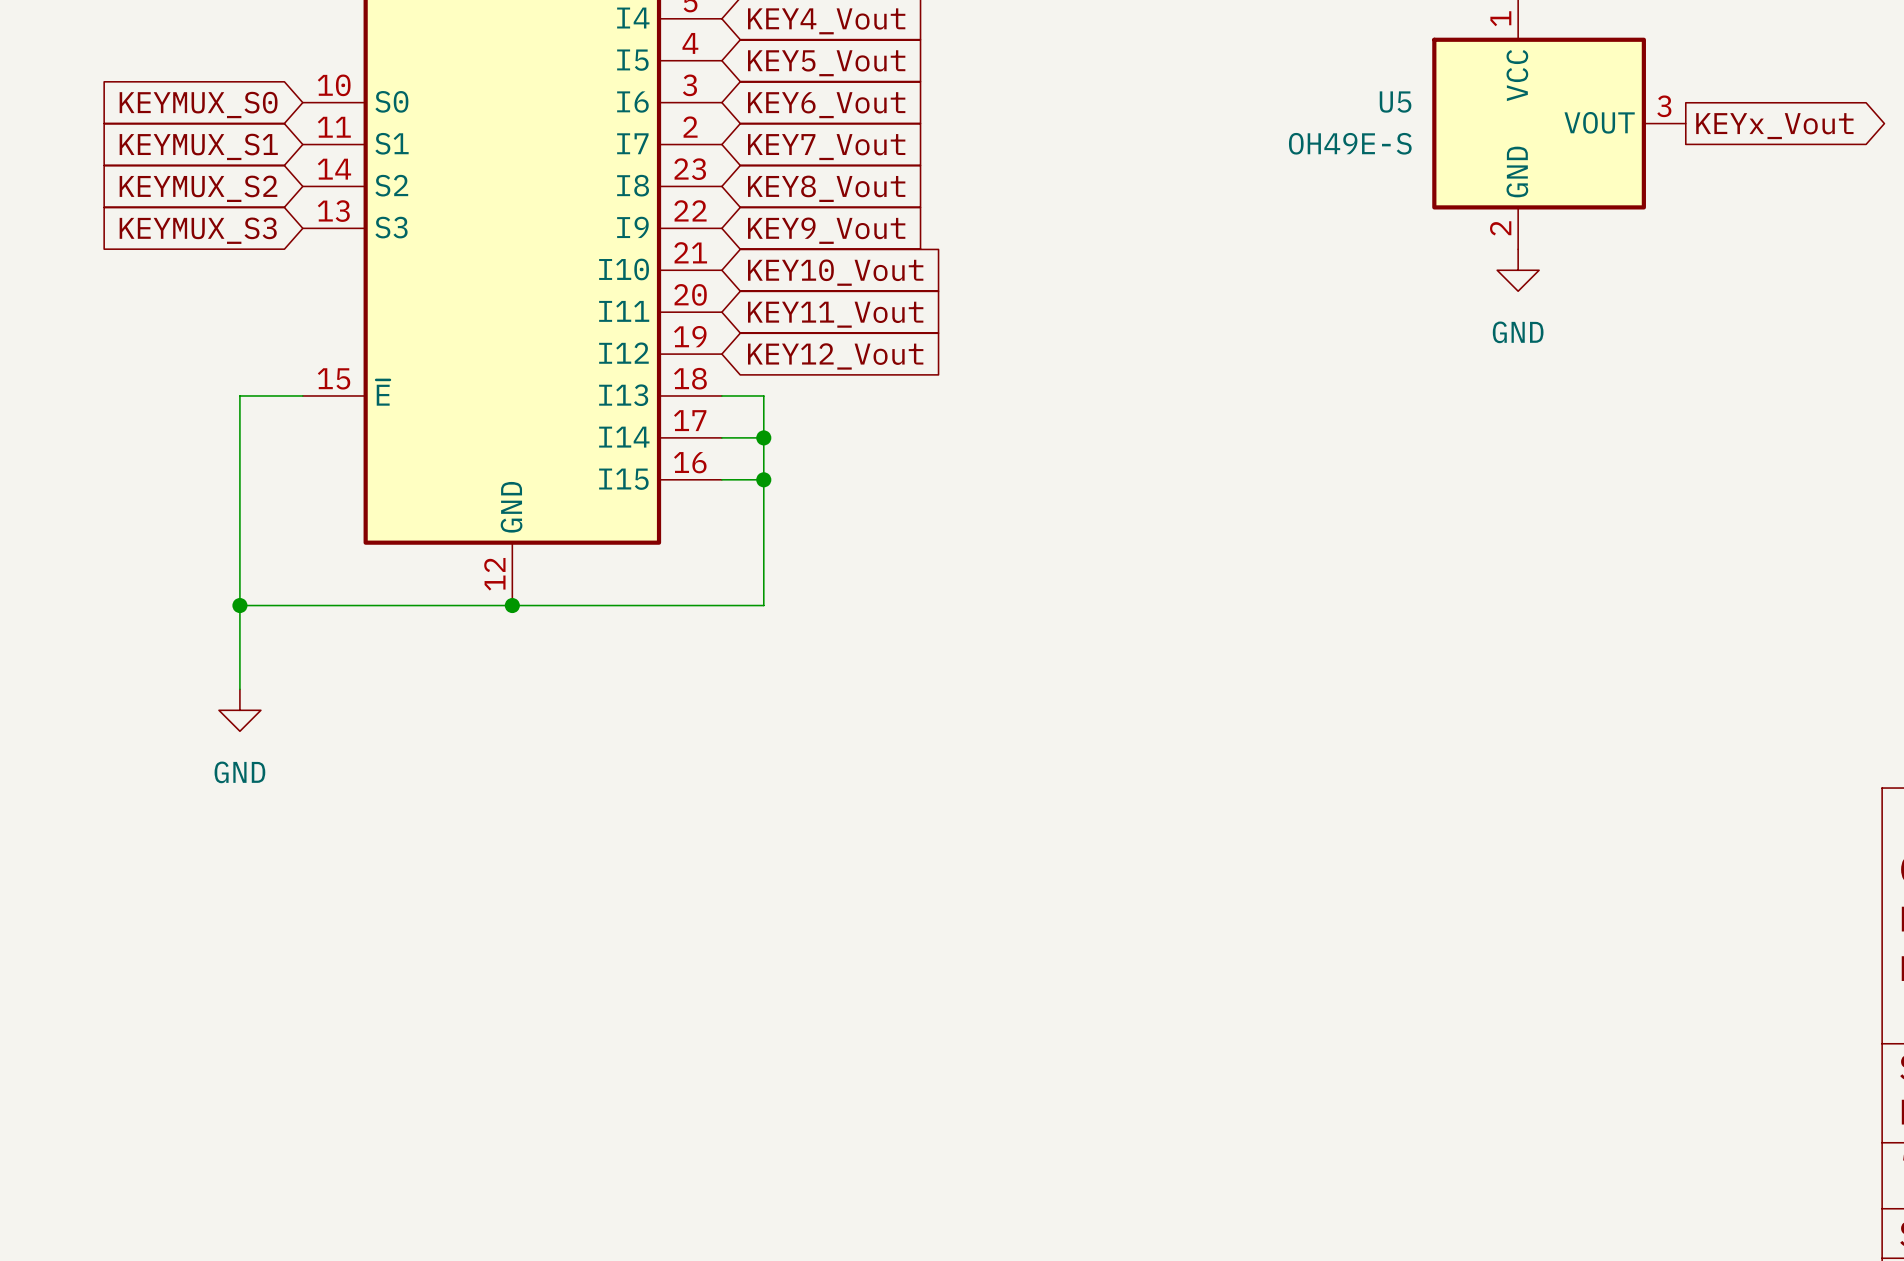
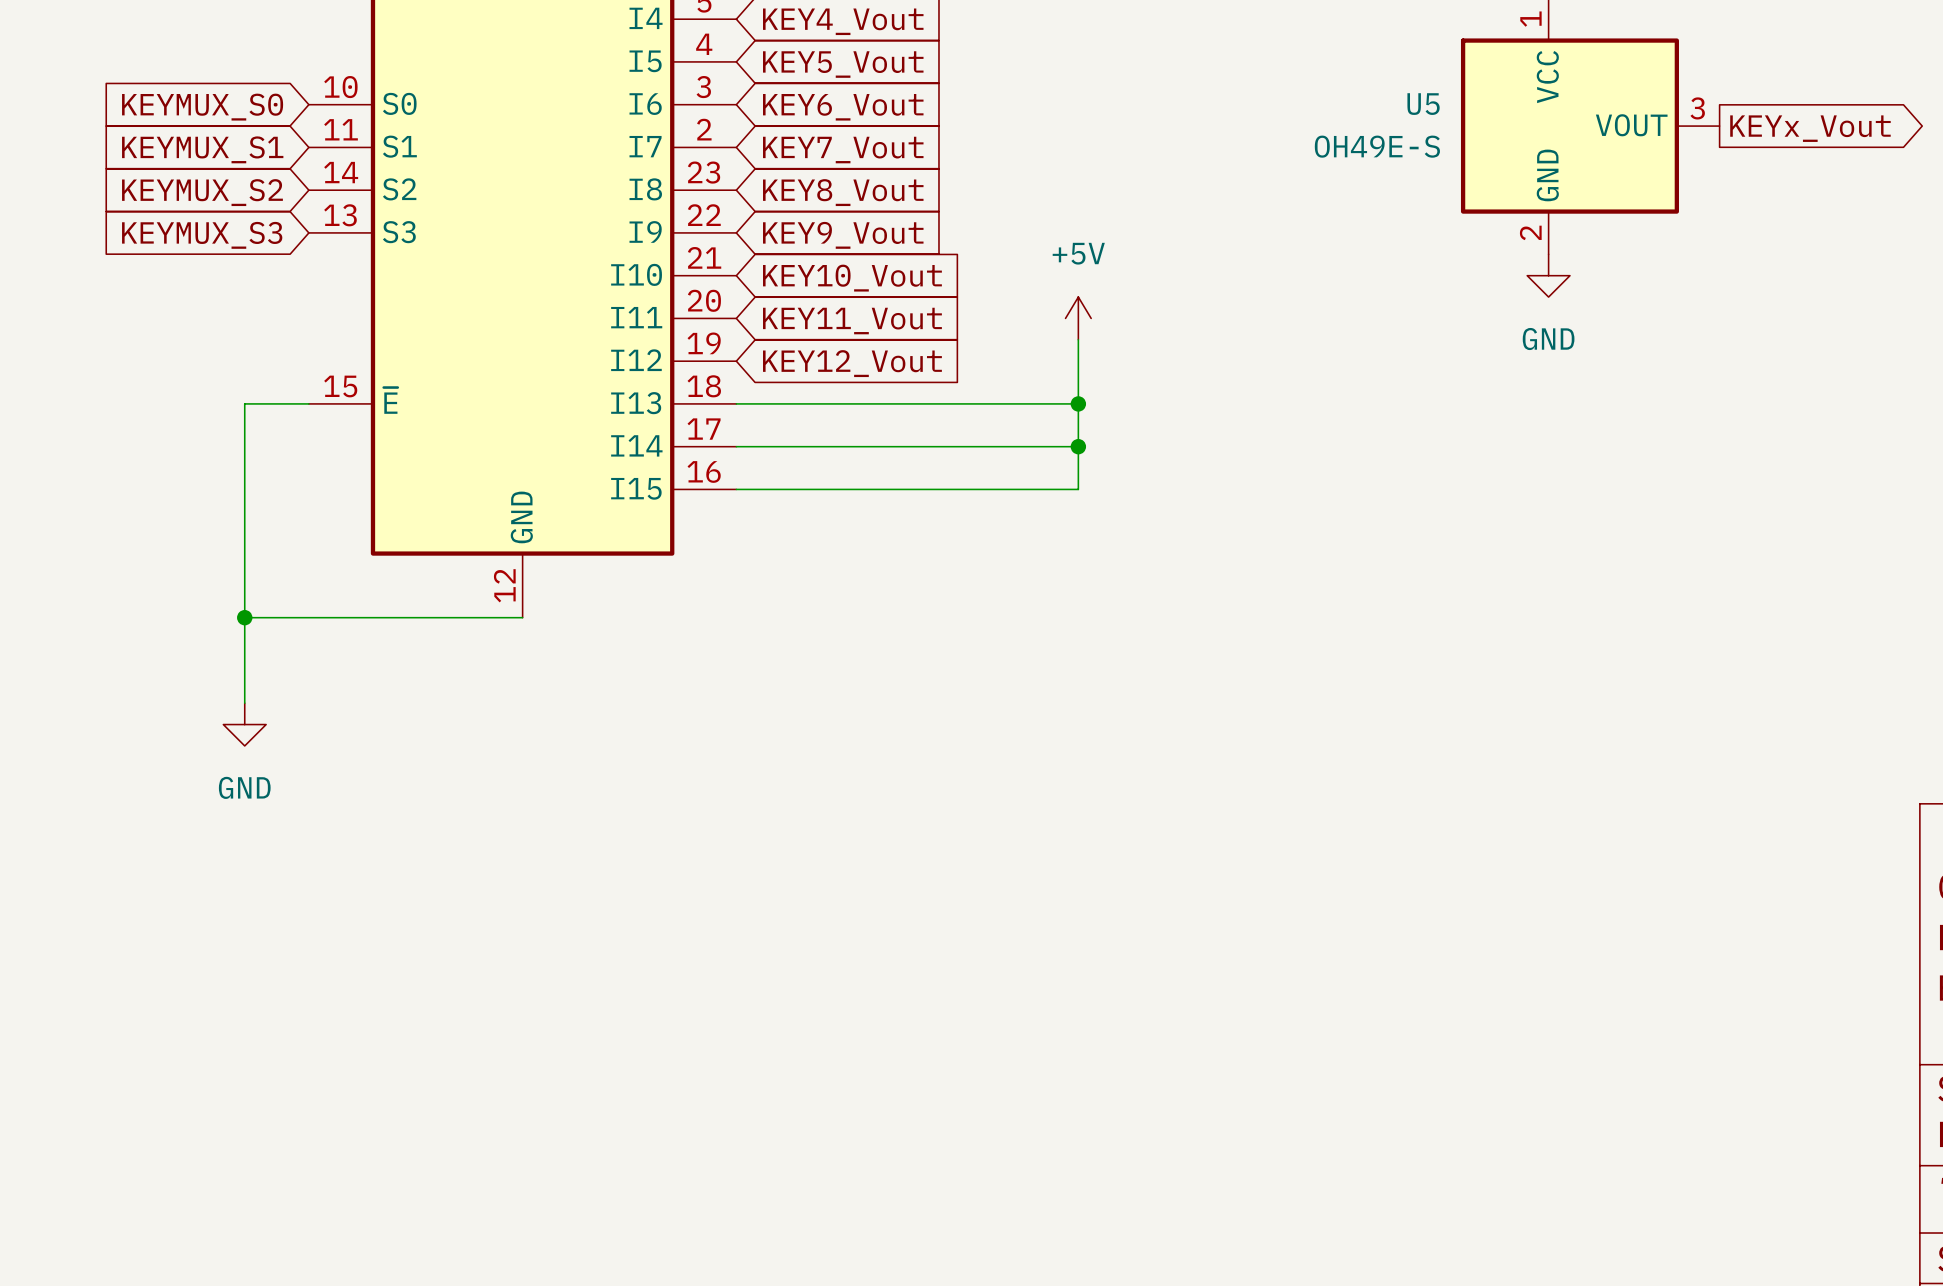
power symbol: none -> +5V (1078, 318)
wire: none -> (1078, 339) (1078, 489) (779, 489)
wire: (763, 395) (763, 605) (512, 605) -> (779, 403) (1078, 403)
junction: none -> (1078, 403)
wire: none -> (779, 446) (1078, 446)
junction: (763, 437) -> none
junction: none -> (1078, 446)
junction: (763, 479) -> none
junction: (512, 605) -> none

